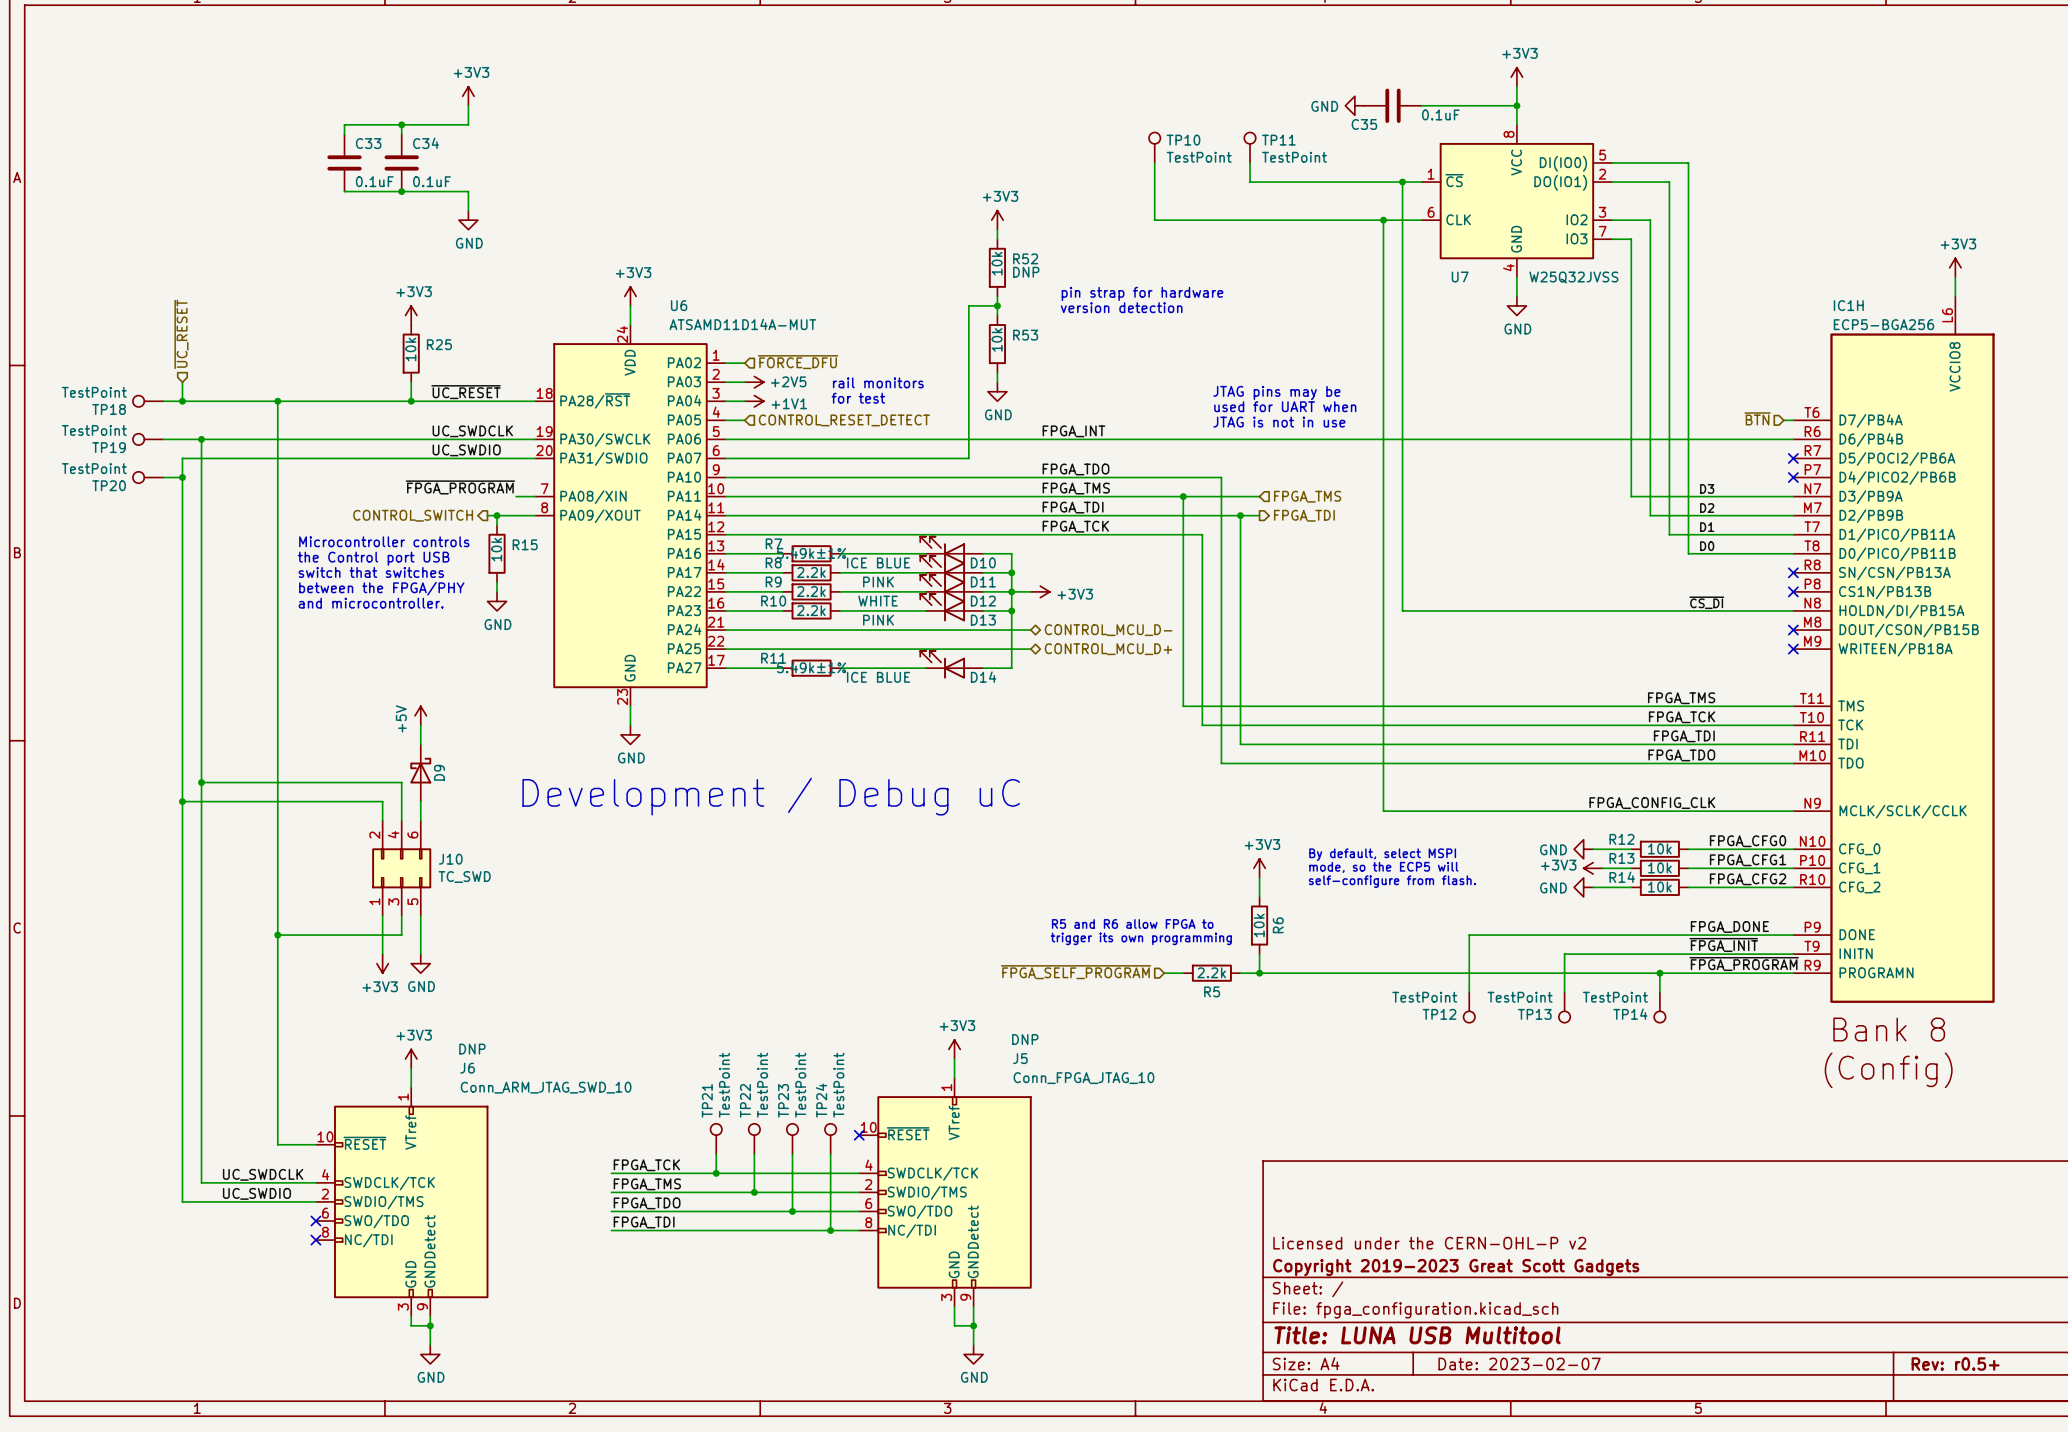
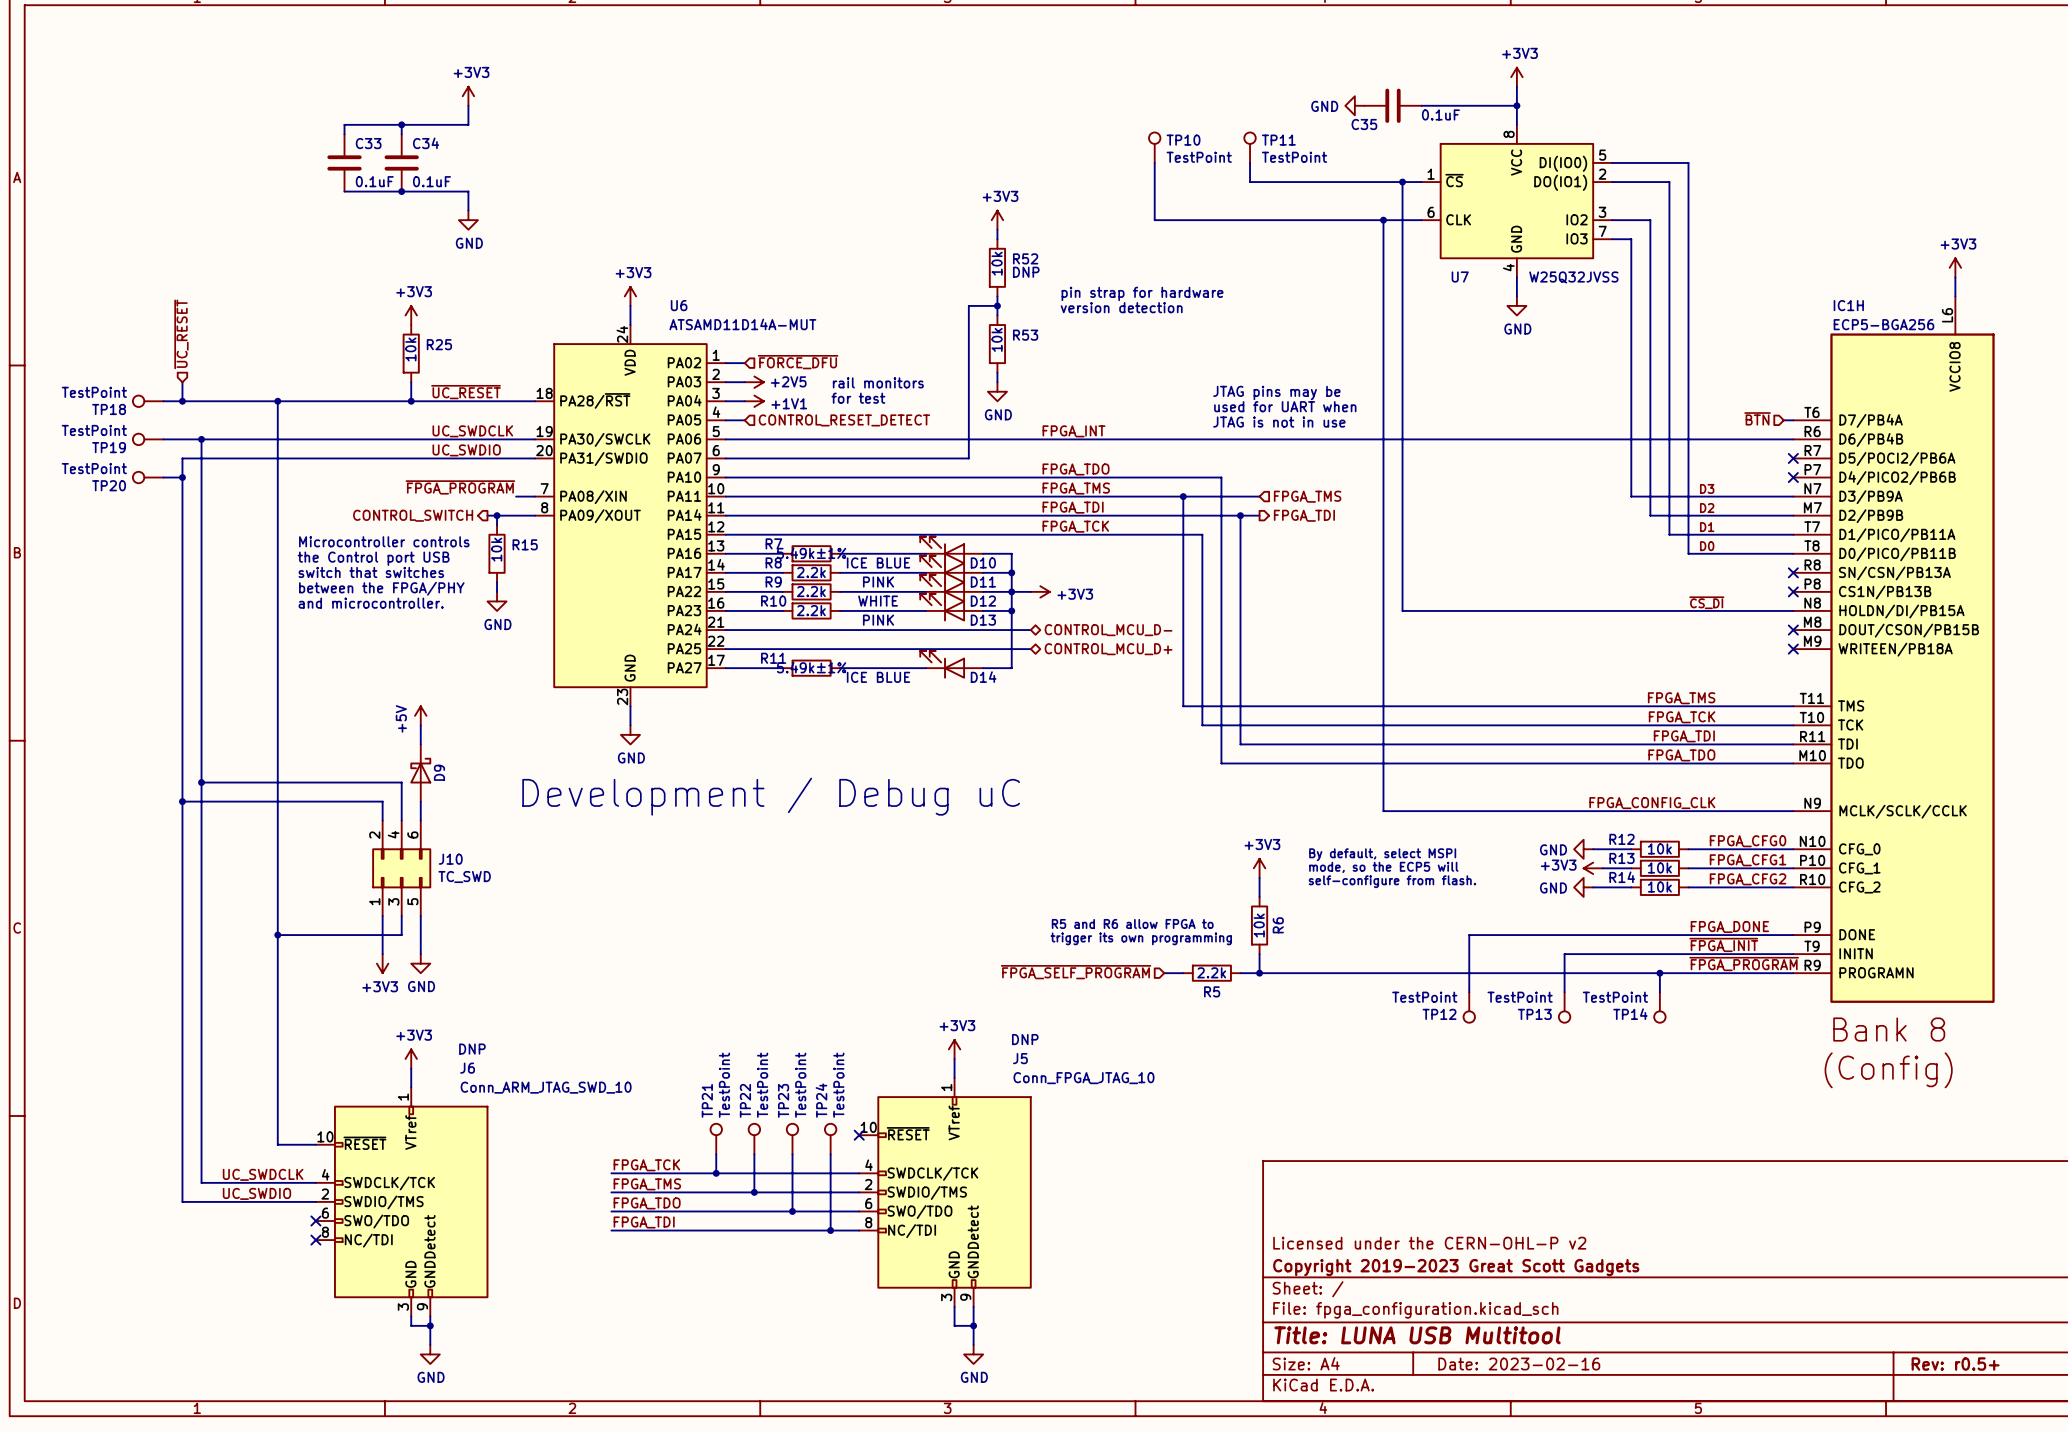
title block: Date: 2023-02-07 (1519, 1364) -> Date: 2023-02-16 (1519, 1364)

